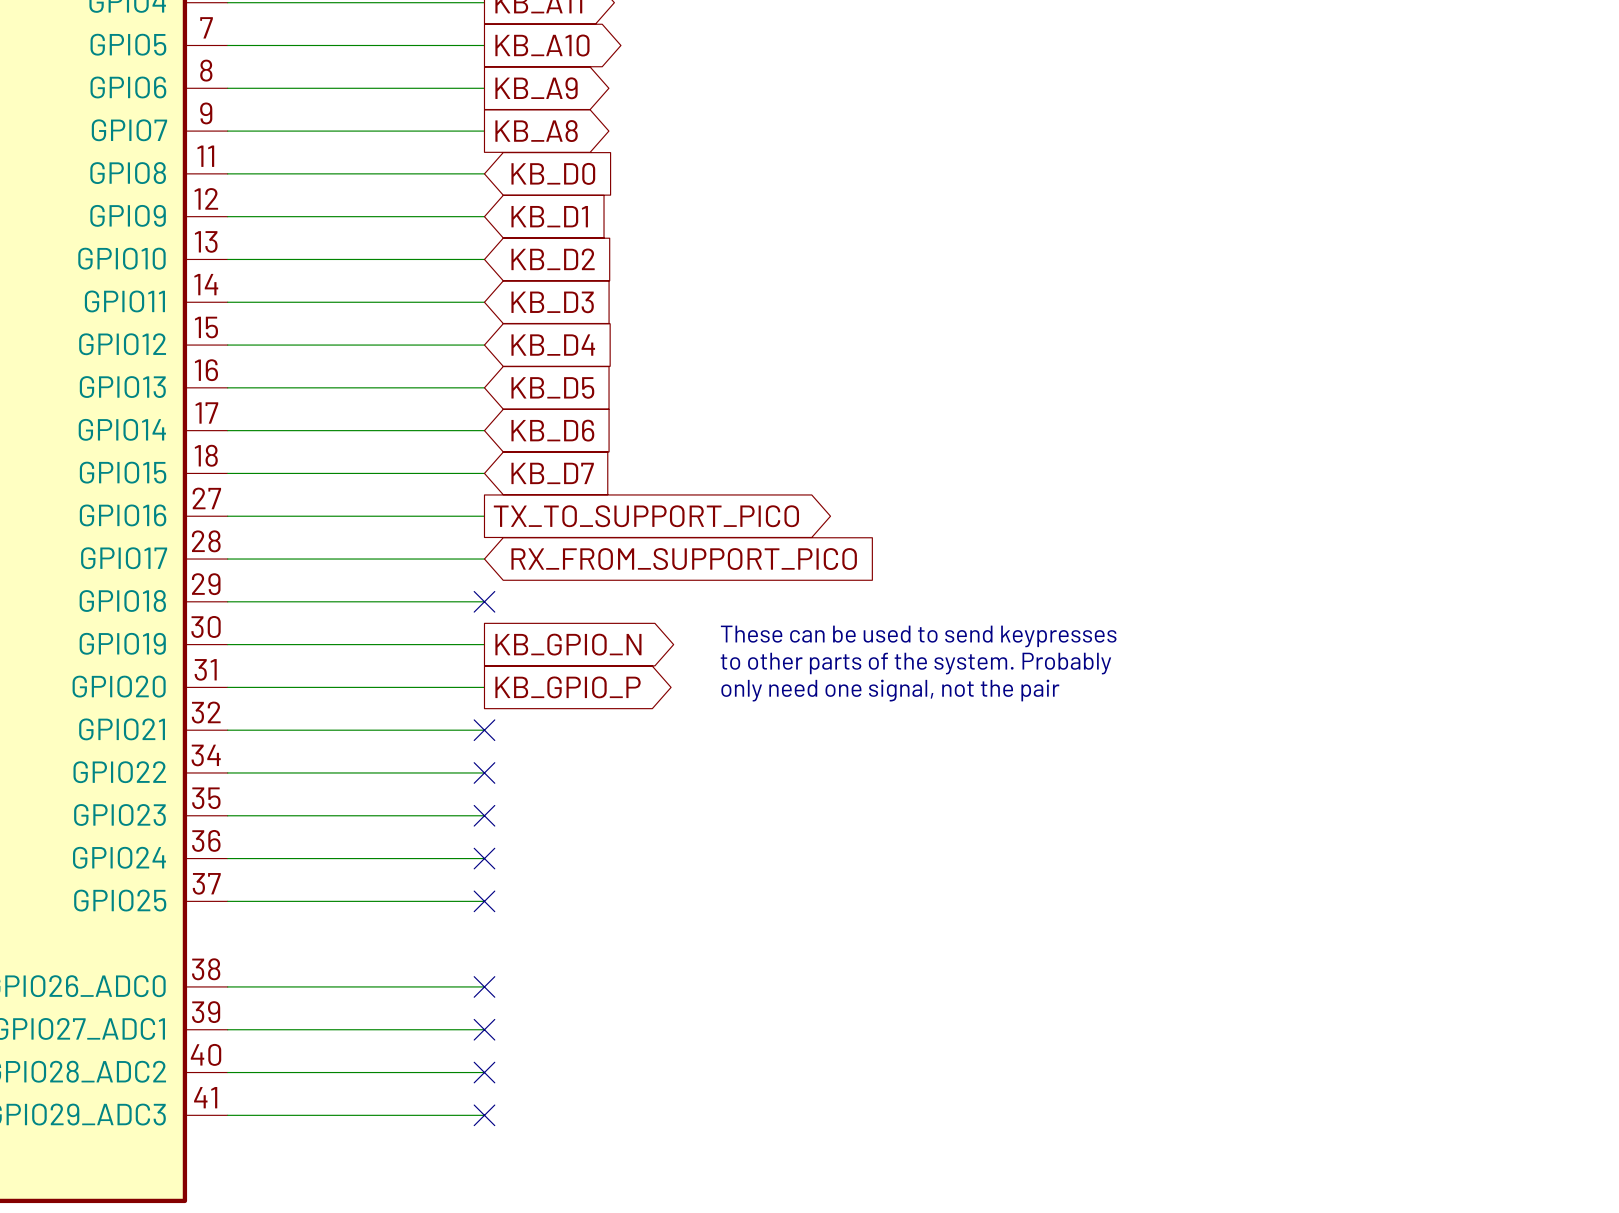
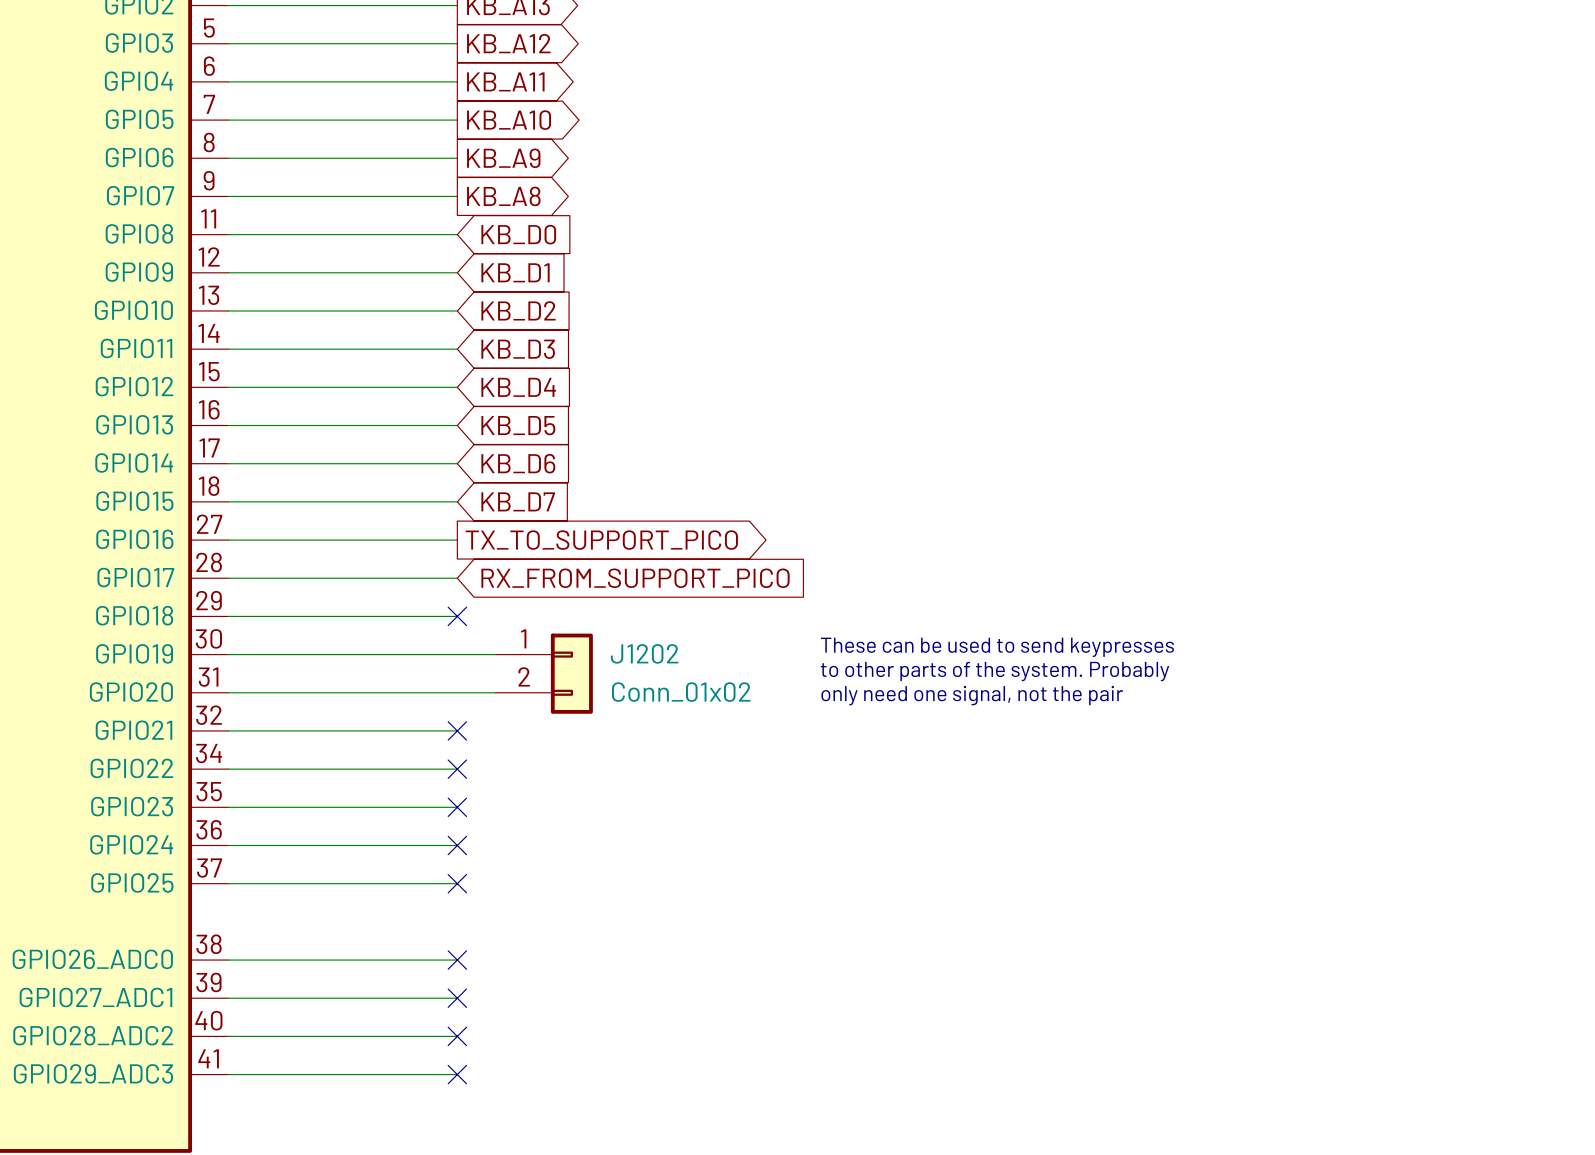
text position: These can be used to send keypresses (918, 636) -> These can be used to send keypresses (997, 647)
wire: none -> (457, 654) (495, 654)
global label: KB_GPIO_N (568, 644) -> none
text position: to other parts of the system. Probably (915, 663) -> to other parts of the system. Probably (995, 671)
J1202: none -> Conn_01x02 (544, 673)
wire: none -> (457, 692) (495, 692)
global label: KB_GPIO_P (568, 687) -> none
text position: only need one signal, not the pair (890, 690) -> only need one signal, not the pair (972, 695)

